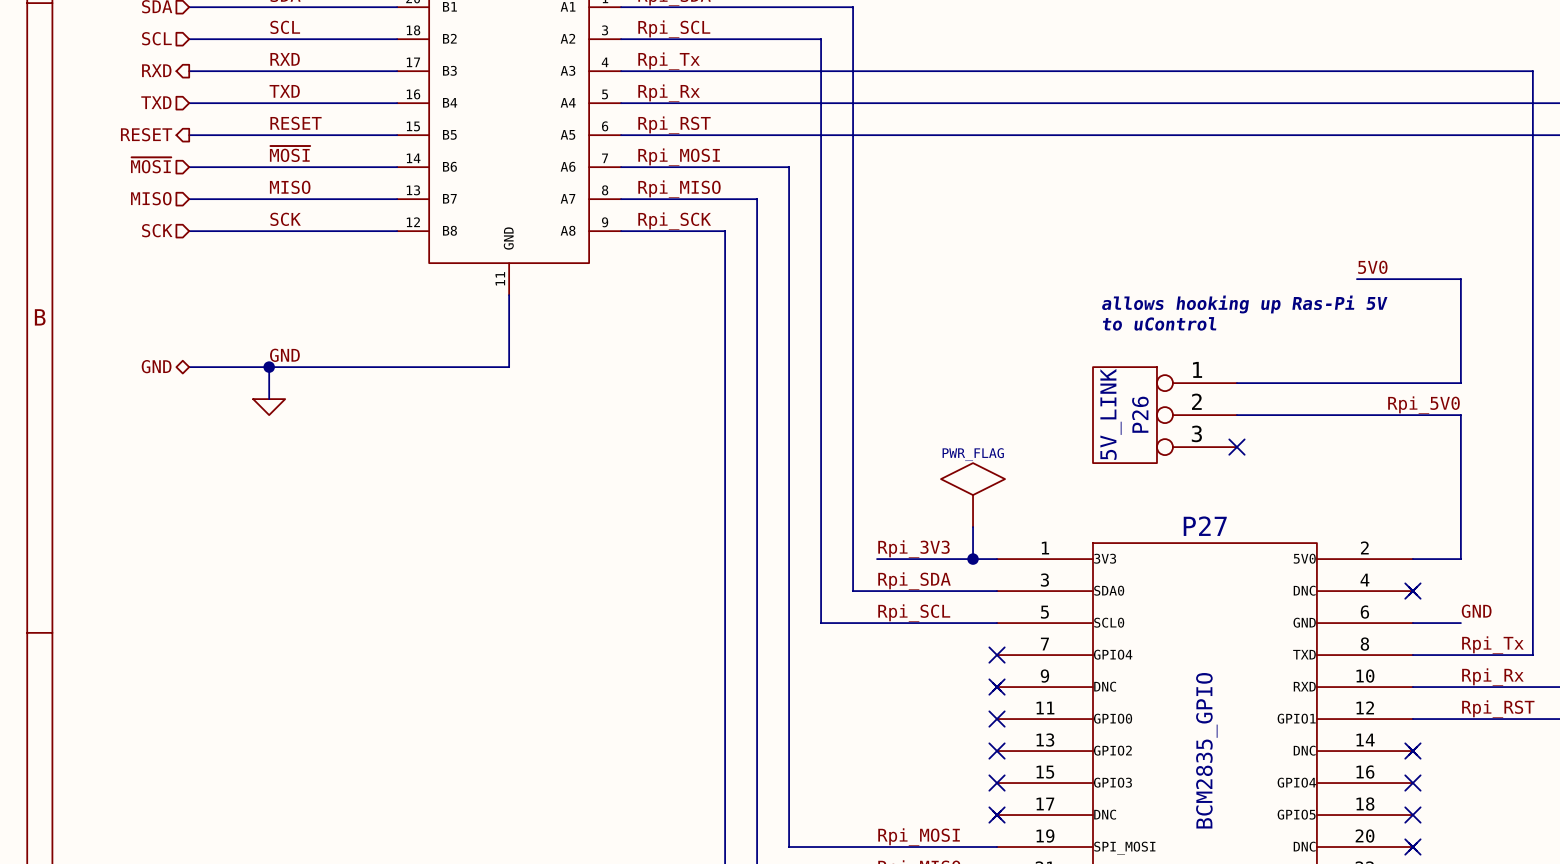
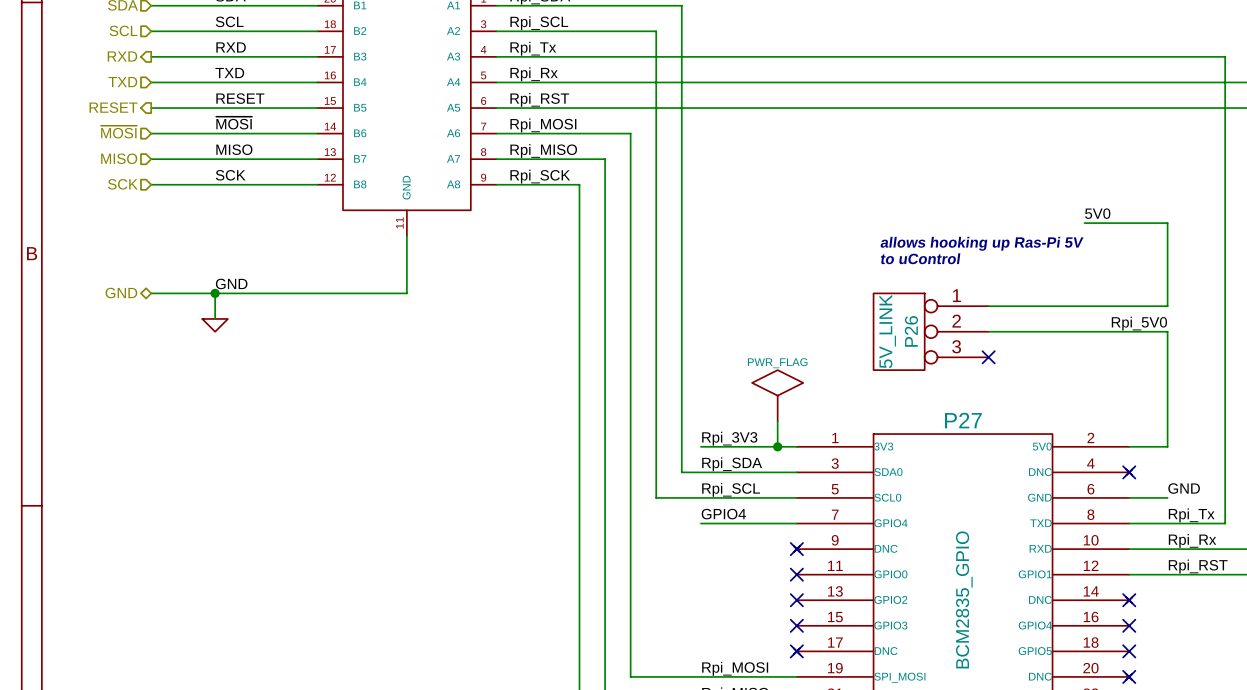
label: none -> GPIO4 (723, 514)
wire: none -> (700, 523) (796, 523)
no-connect mark: (997, 655) -> none

